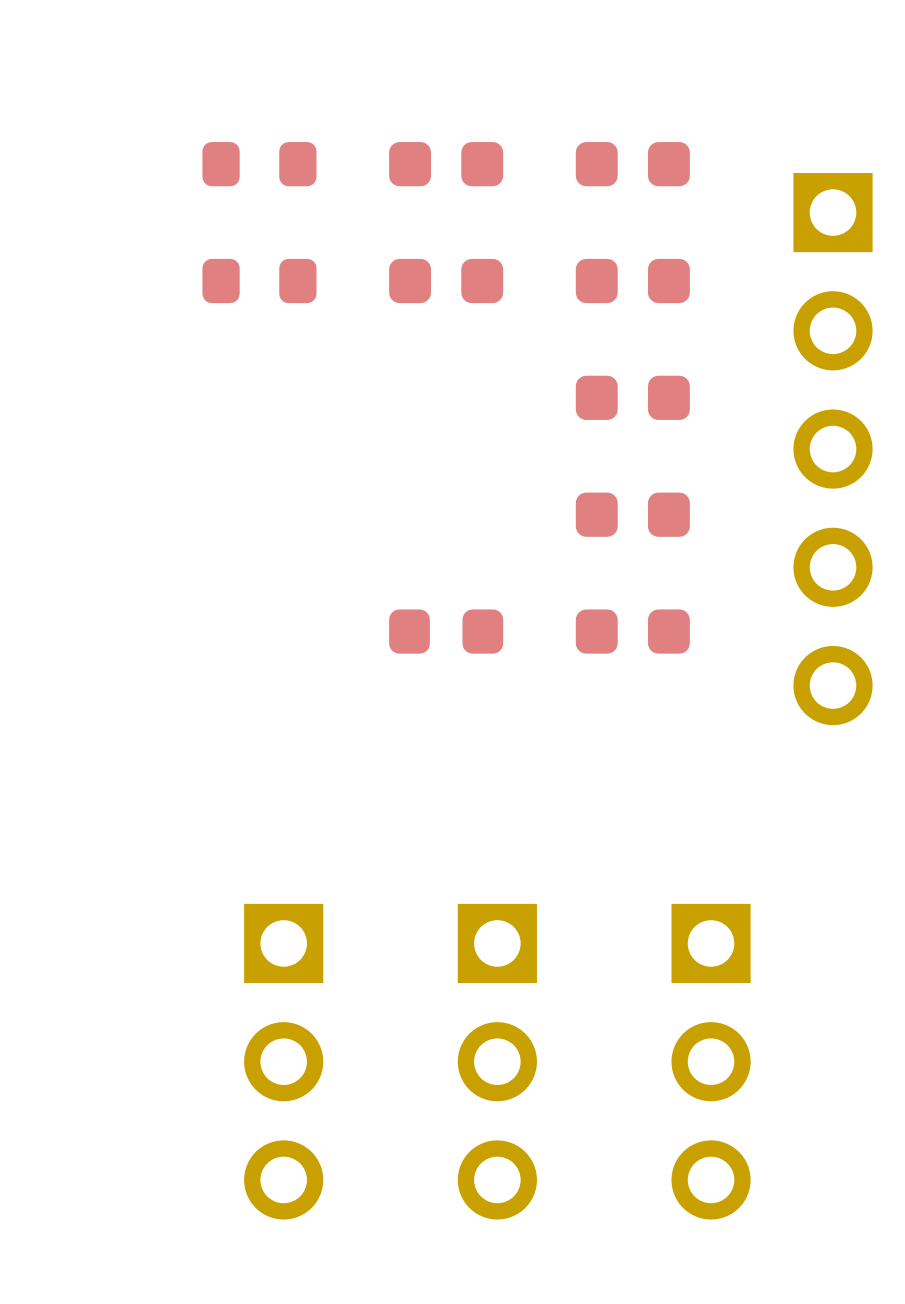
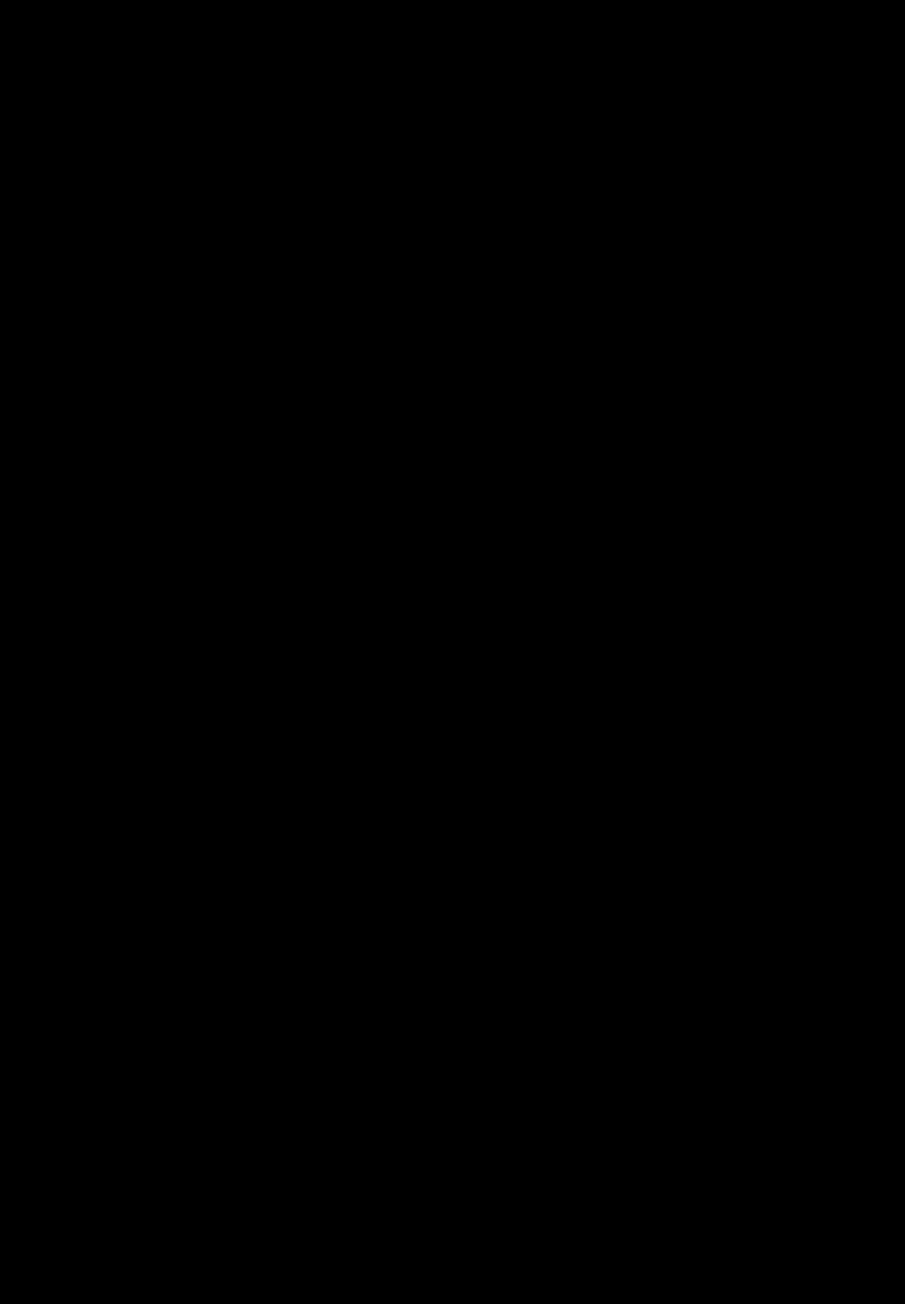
part: (259, 164) -> none
part: (446, 164) -> none
part: (632, 164) -> none
part: (259, 281) -> none
part: (446, 281) -> none
part: (632, 281) -> none
part: (632, 397) -> none
part: (833, 449) -> none
part: (632, 514) -> none
part: (446, 631) -> none
part: (632, 631) -> none
part: (283, 1061) -> none
part: (497, 1061) -> none
part: (711, 1061) -> none

